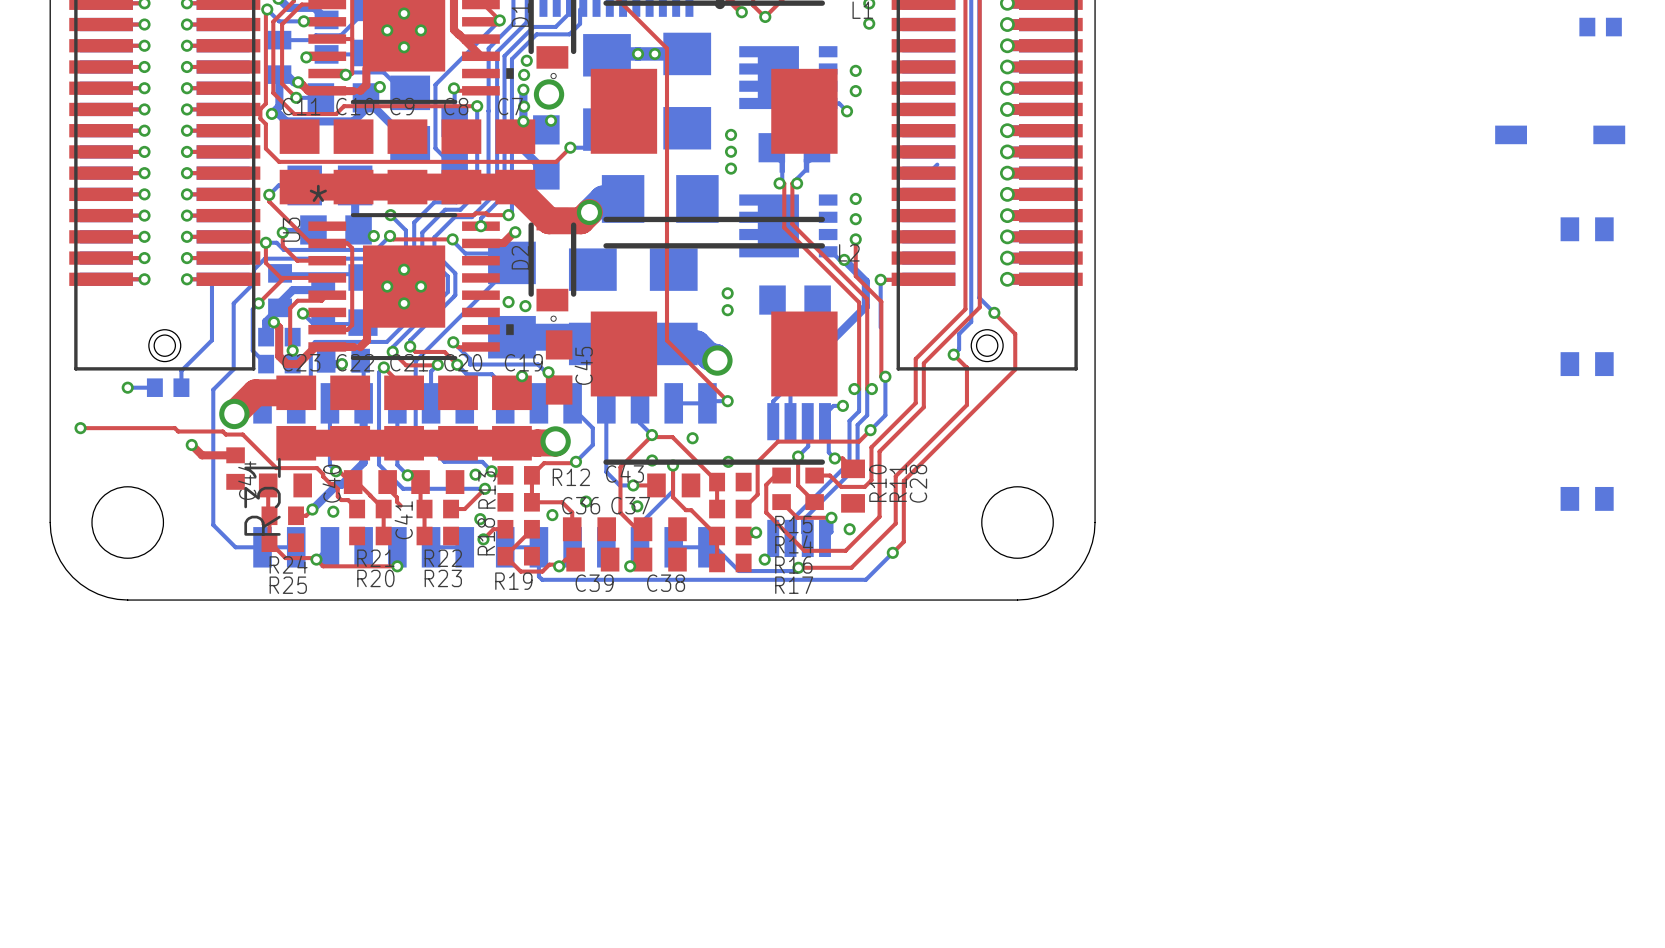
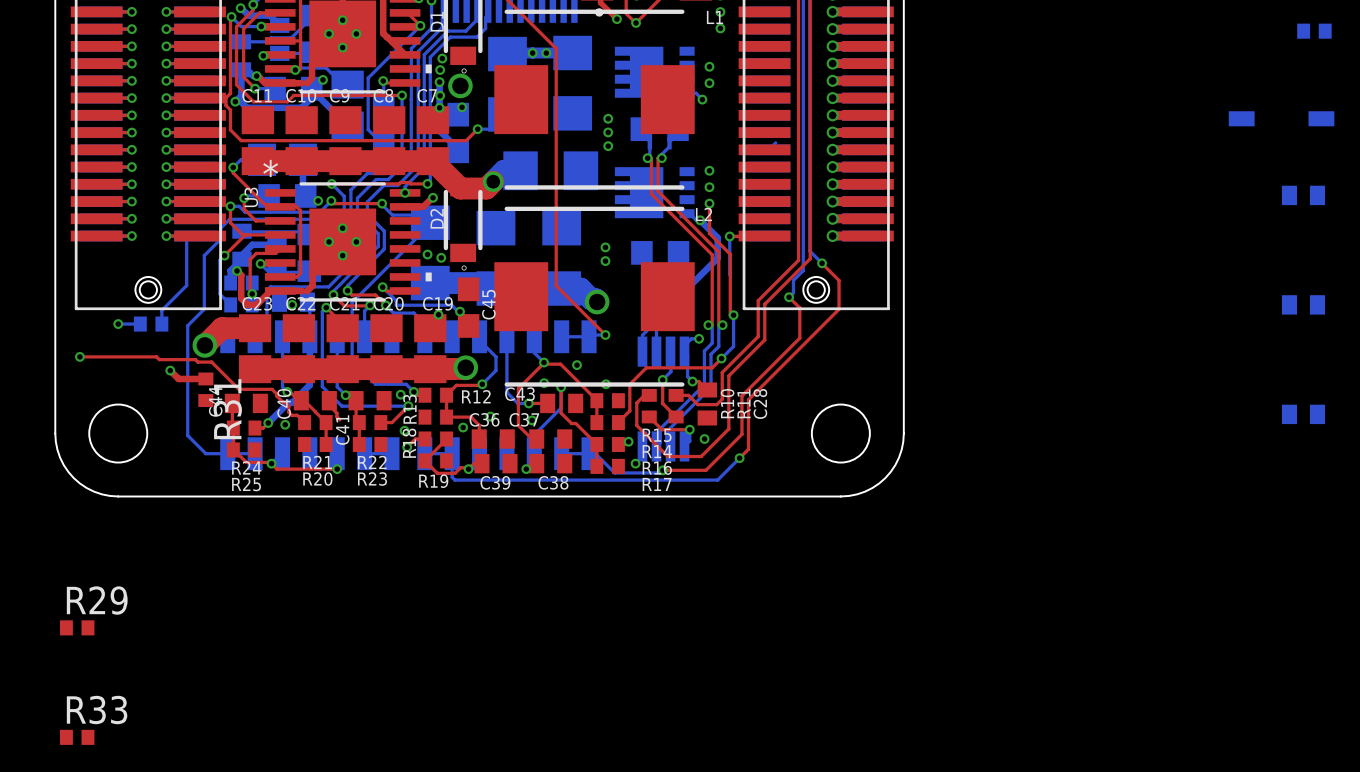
R29: none -> (77, 627)
R33: none -> (77, 737)

